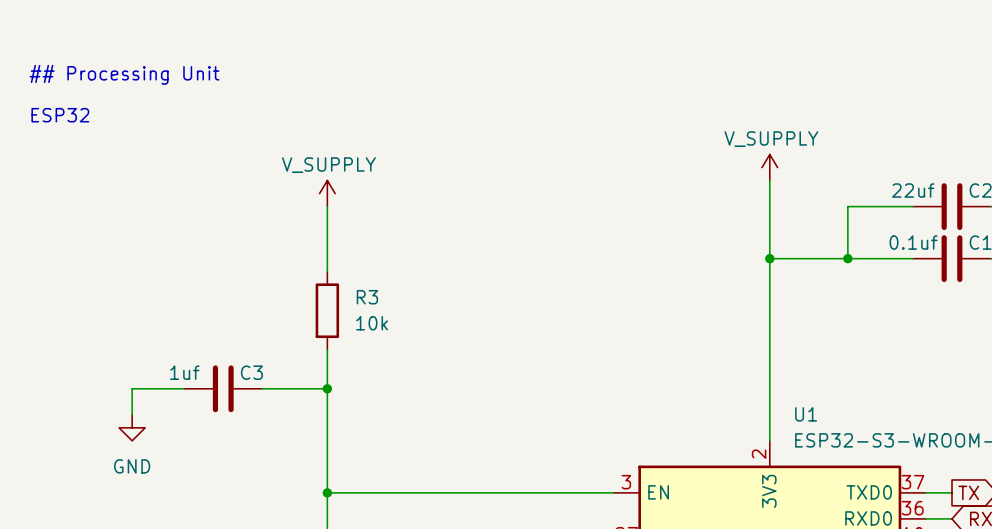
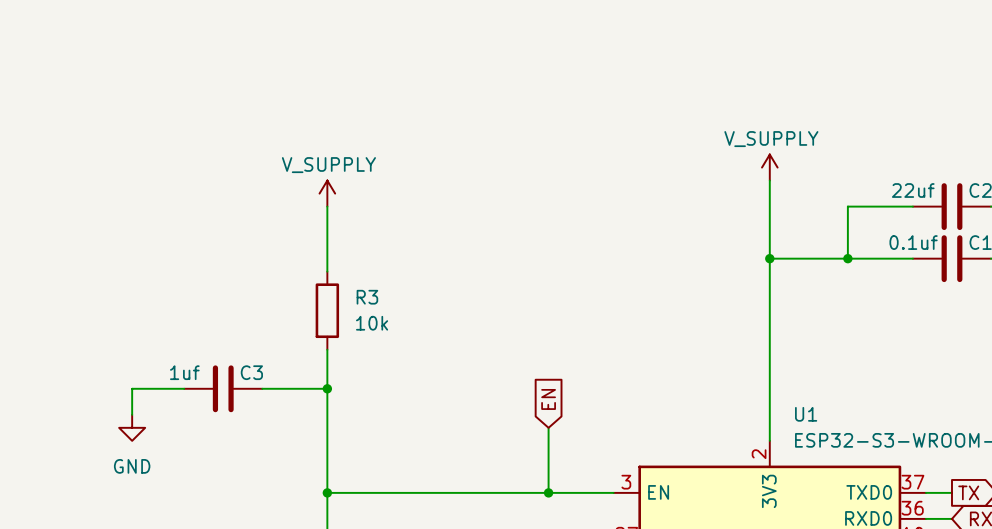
text: ## Processing Unit (124, 74) -> none
text: ESP32 (60, 115) -> none
global label: none -> EN (548, 399)
wire: none -> (548, 427) (548, 492)
junction: none -> (548, 492)

